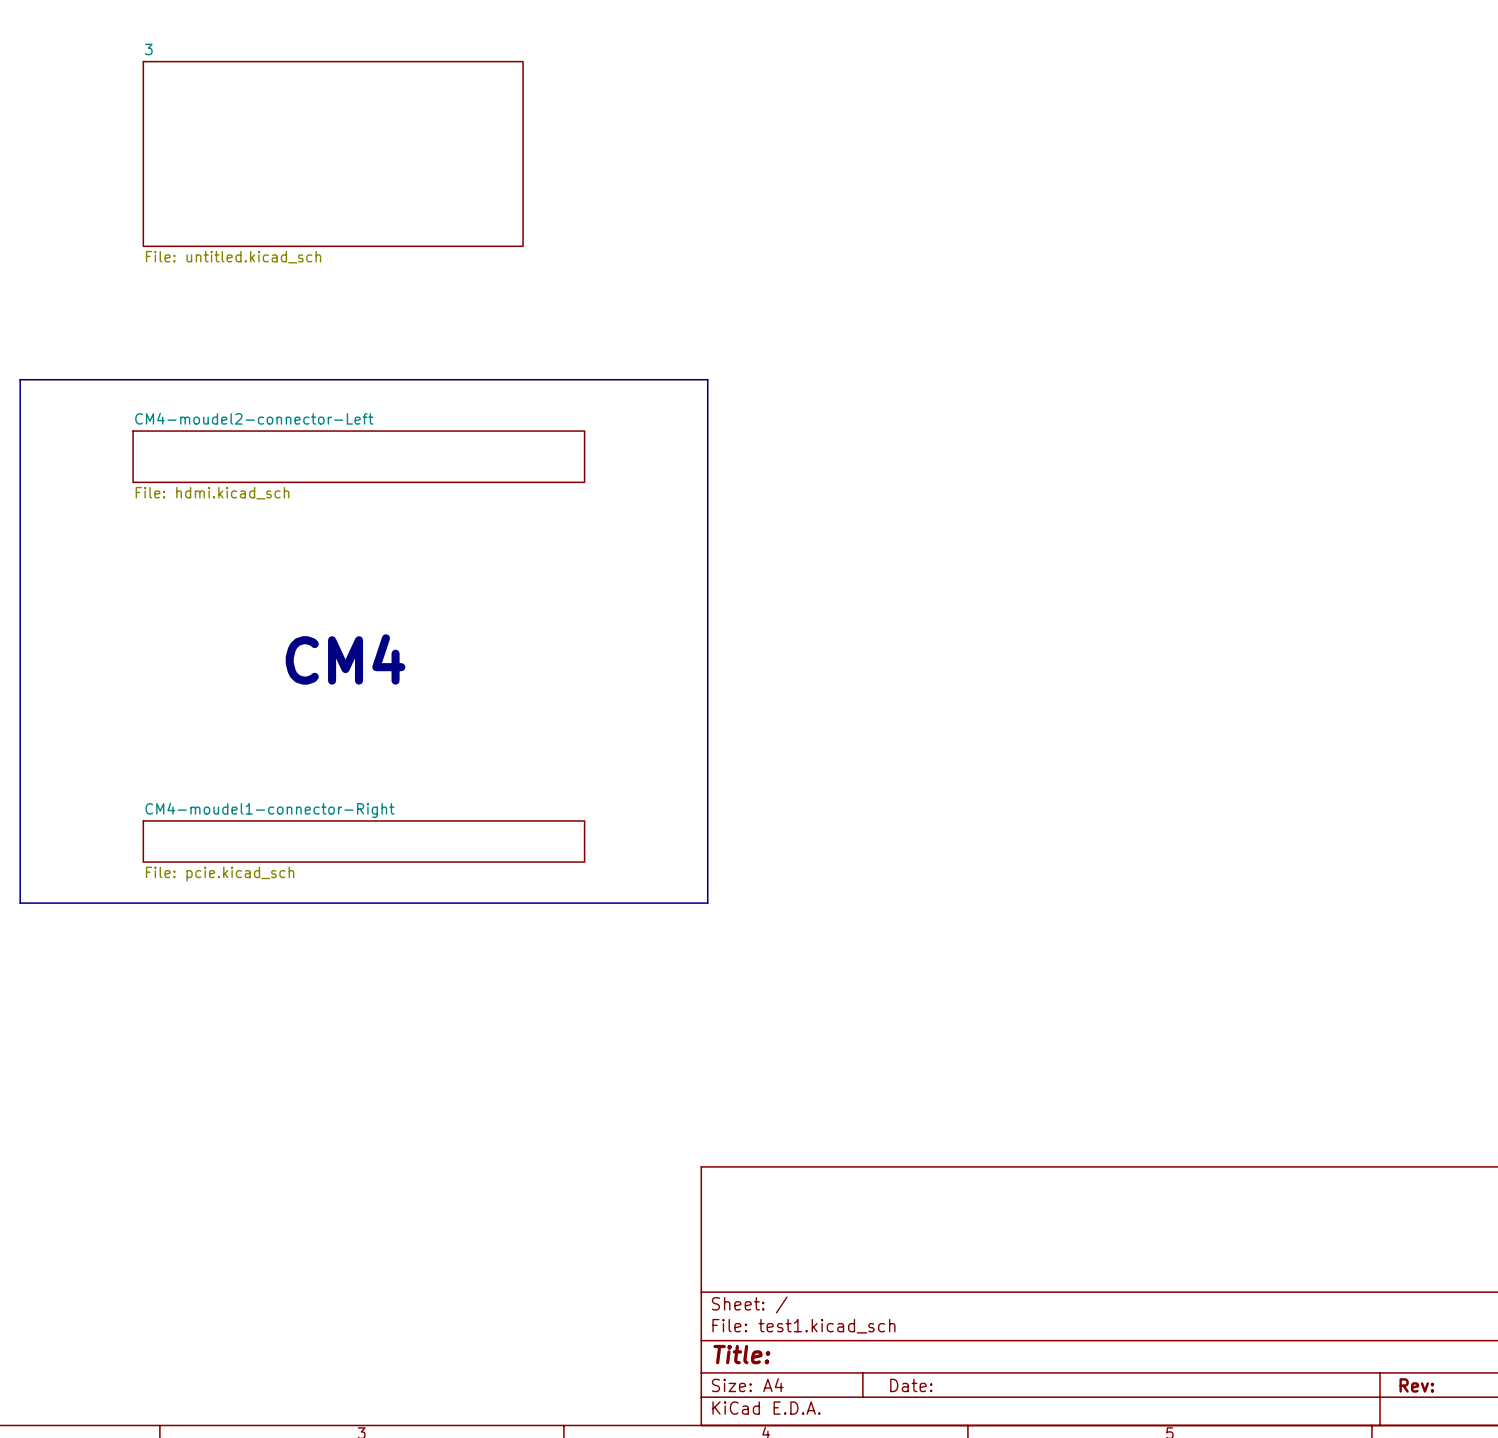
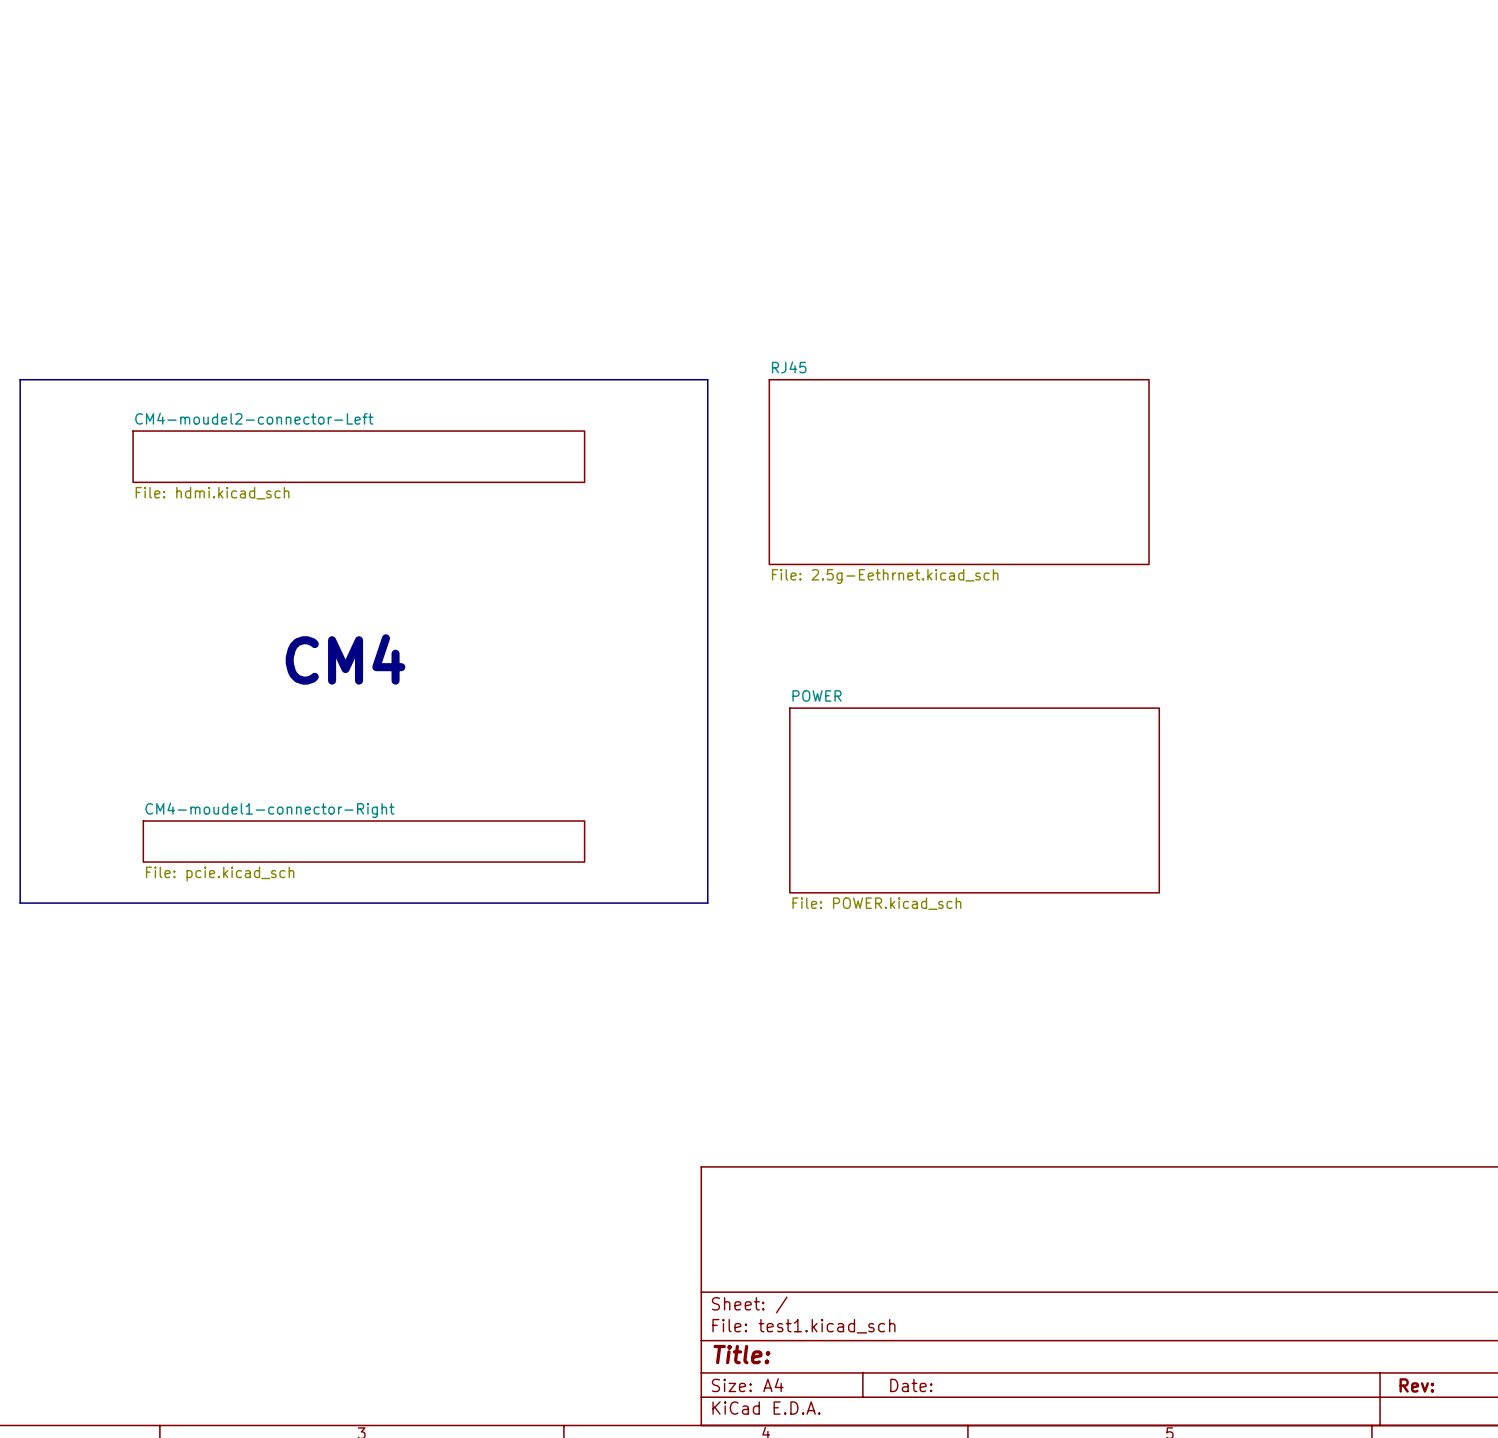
sheet 3: File: untitled.kicad_sch (333, 153) -> none
sheet RJ45: none -> File: 2.5g-Eethrnet.kicad_sch (959, 472)
sheet POWER: none -> File: POWER.kicad_sch (974, 800)

